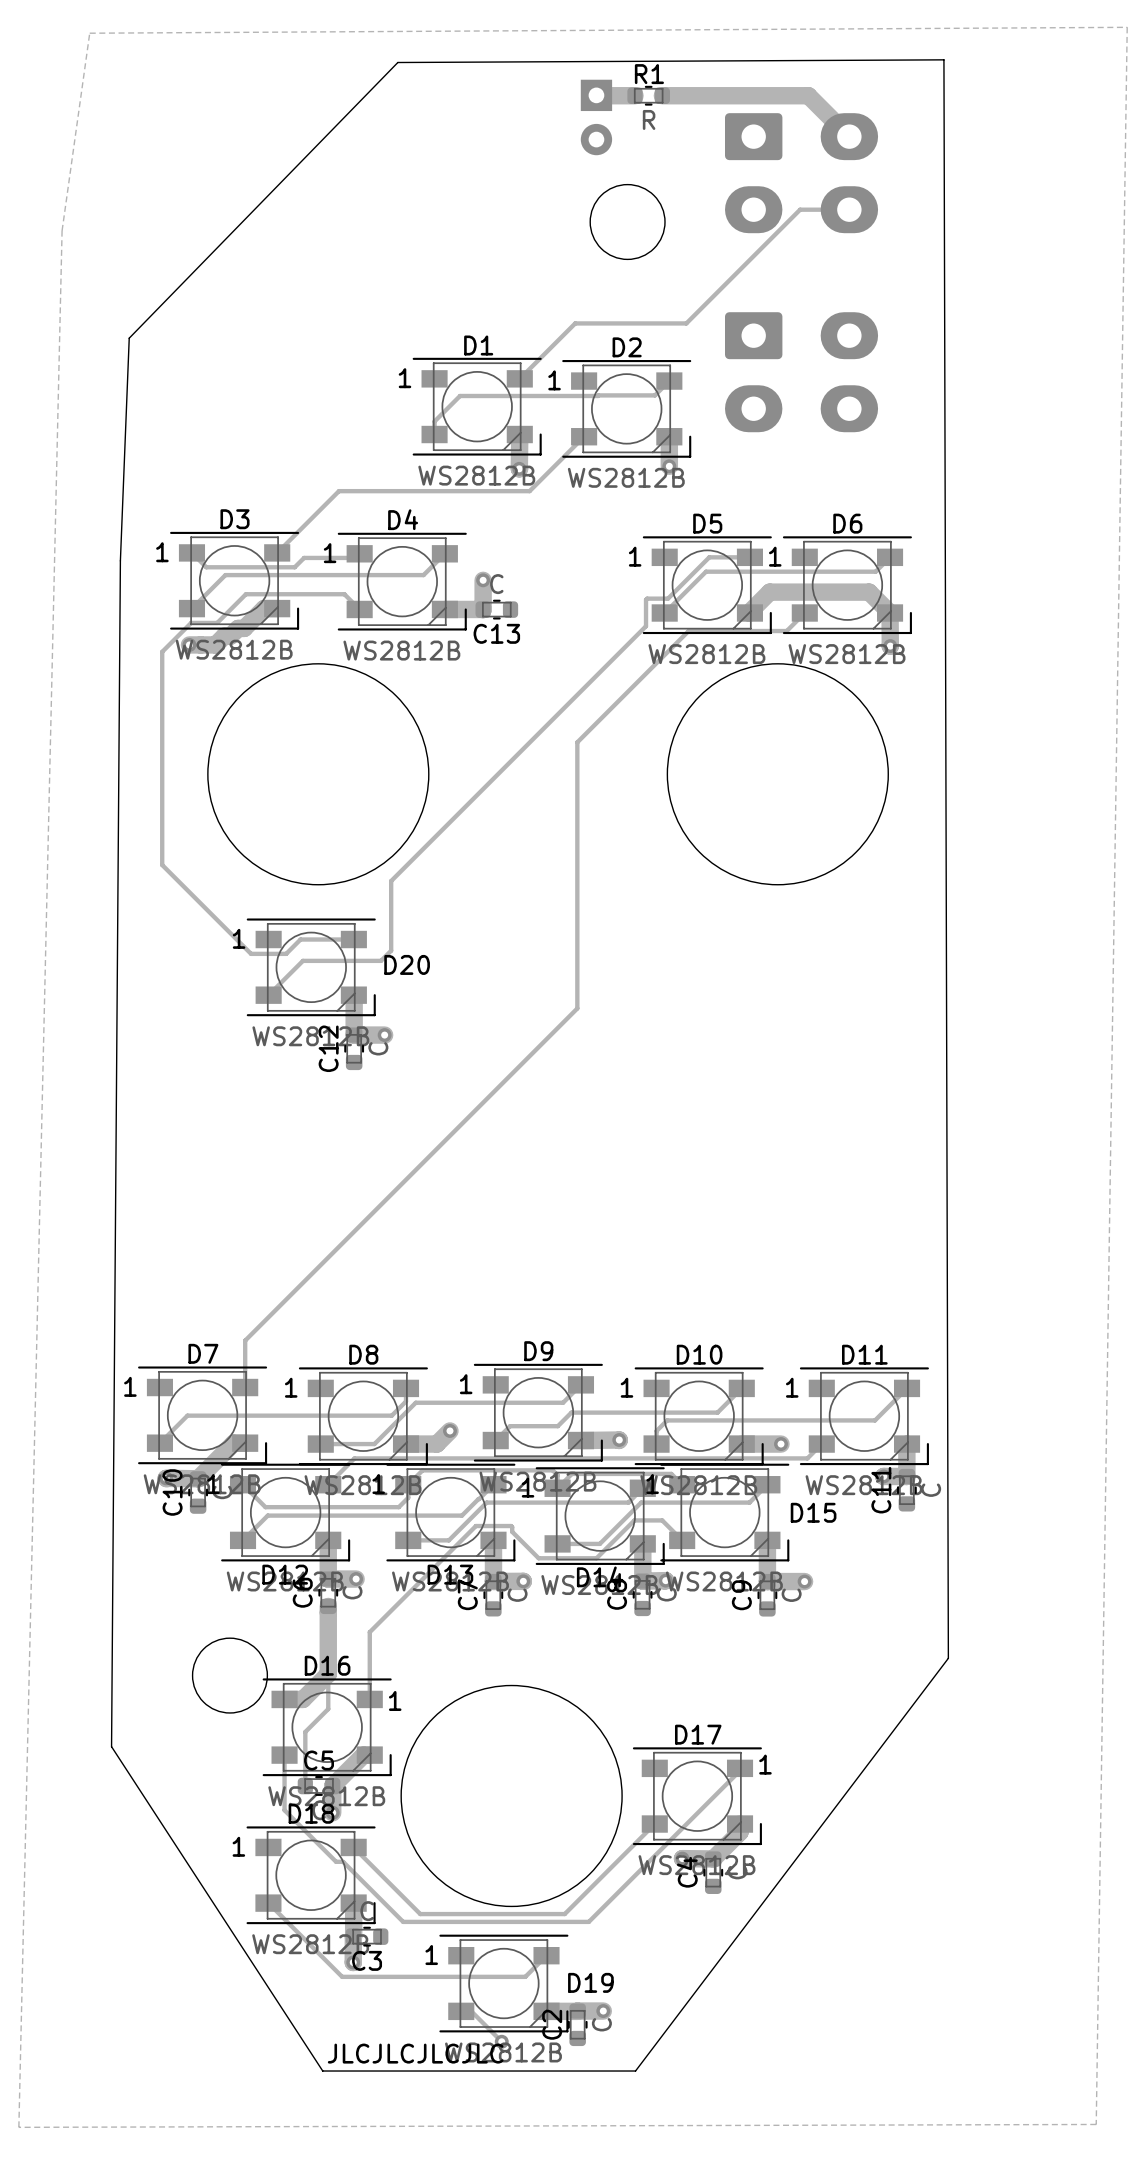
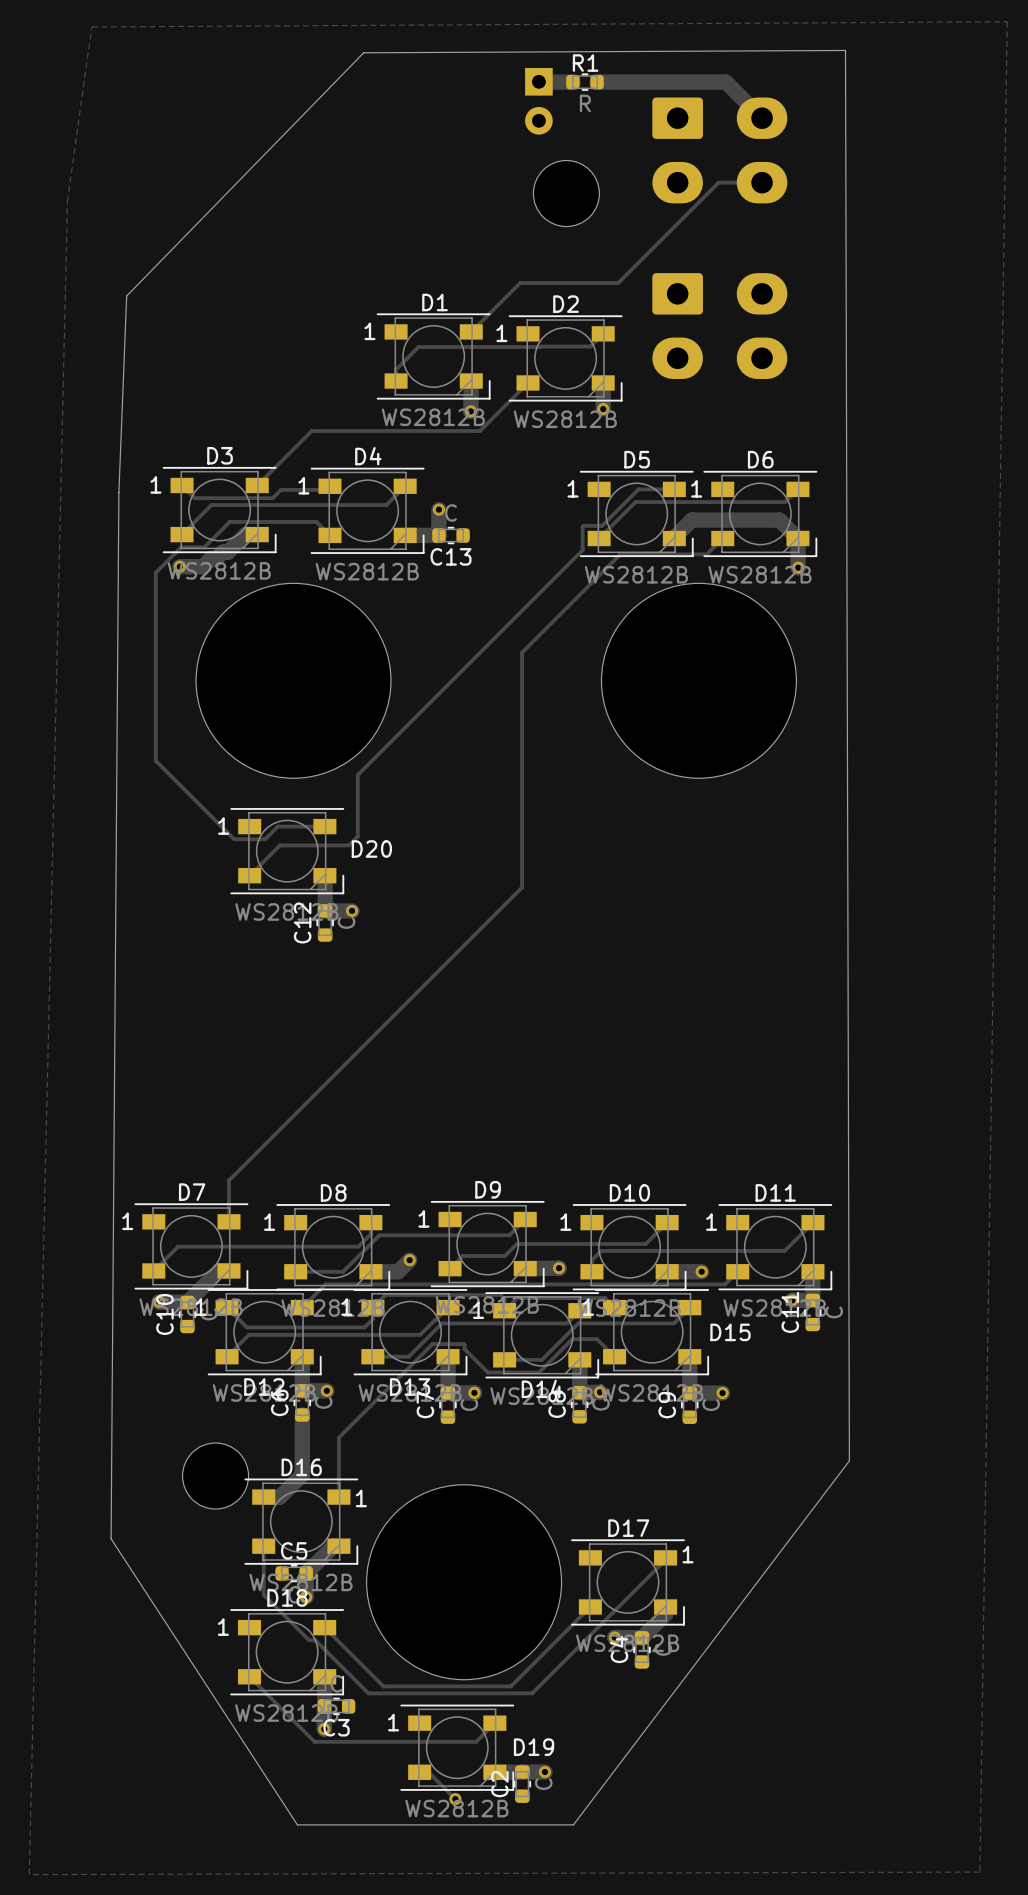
track: (328, 1612) (328, 1709) (305, 1731) (305, 1786) -> none
text: JLCJLCJLCJLC (415, 2053) -> none

